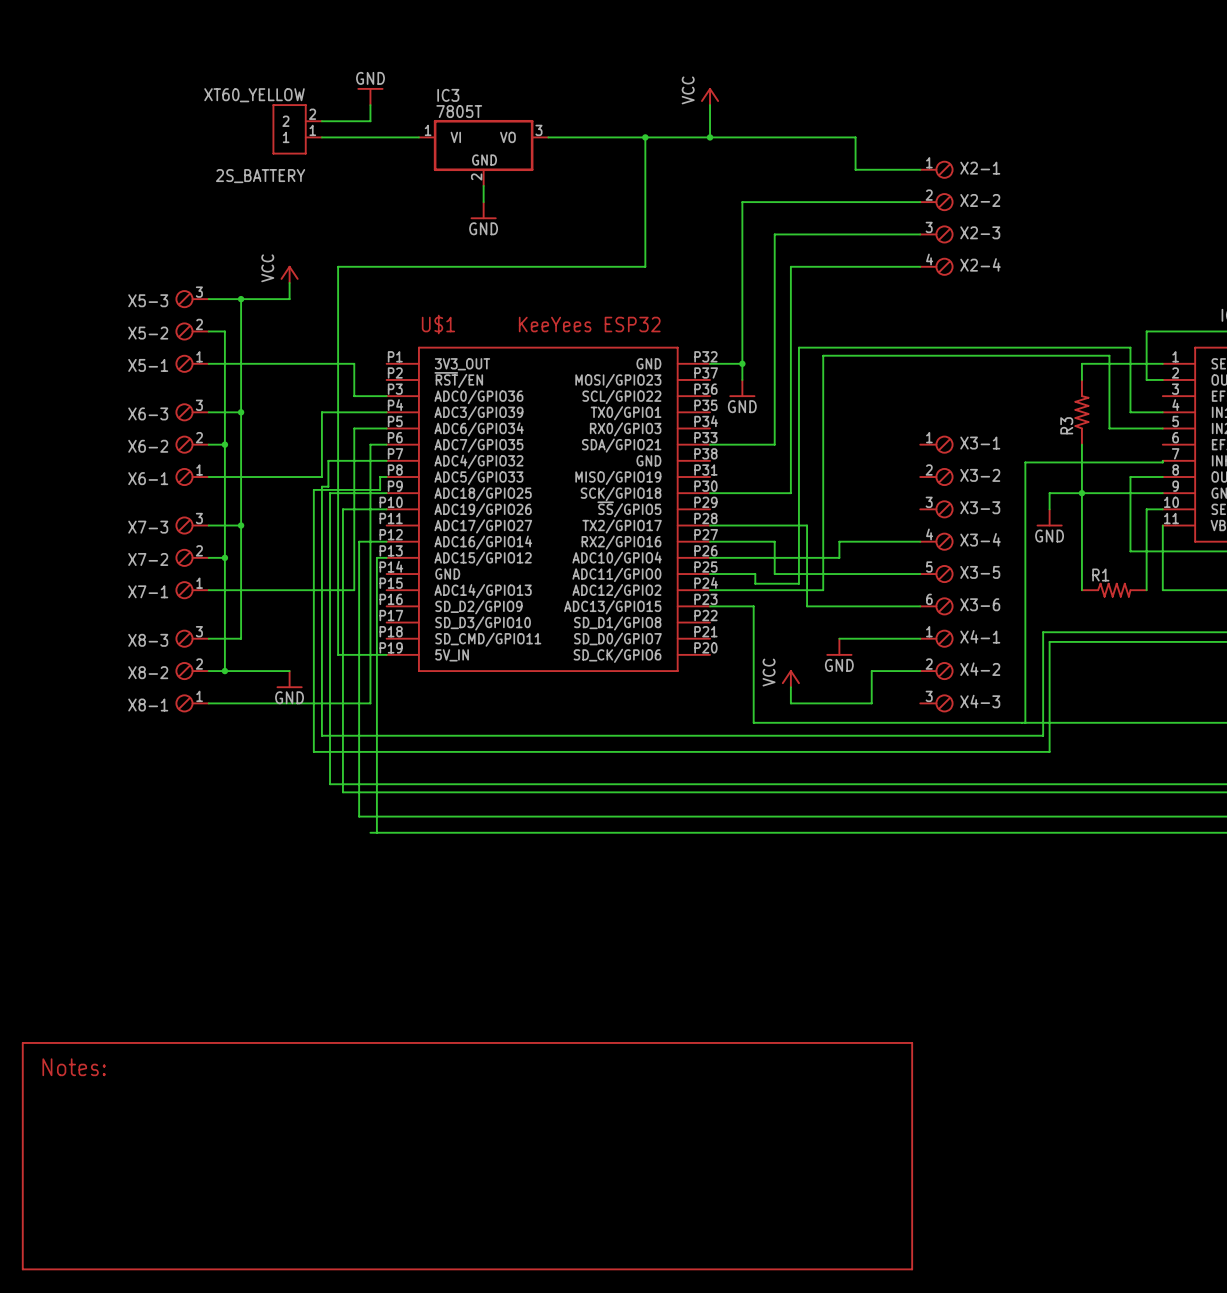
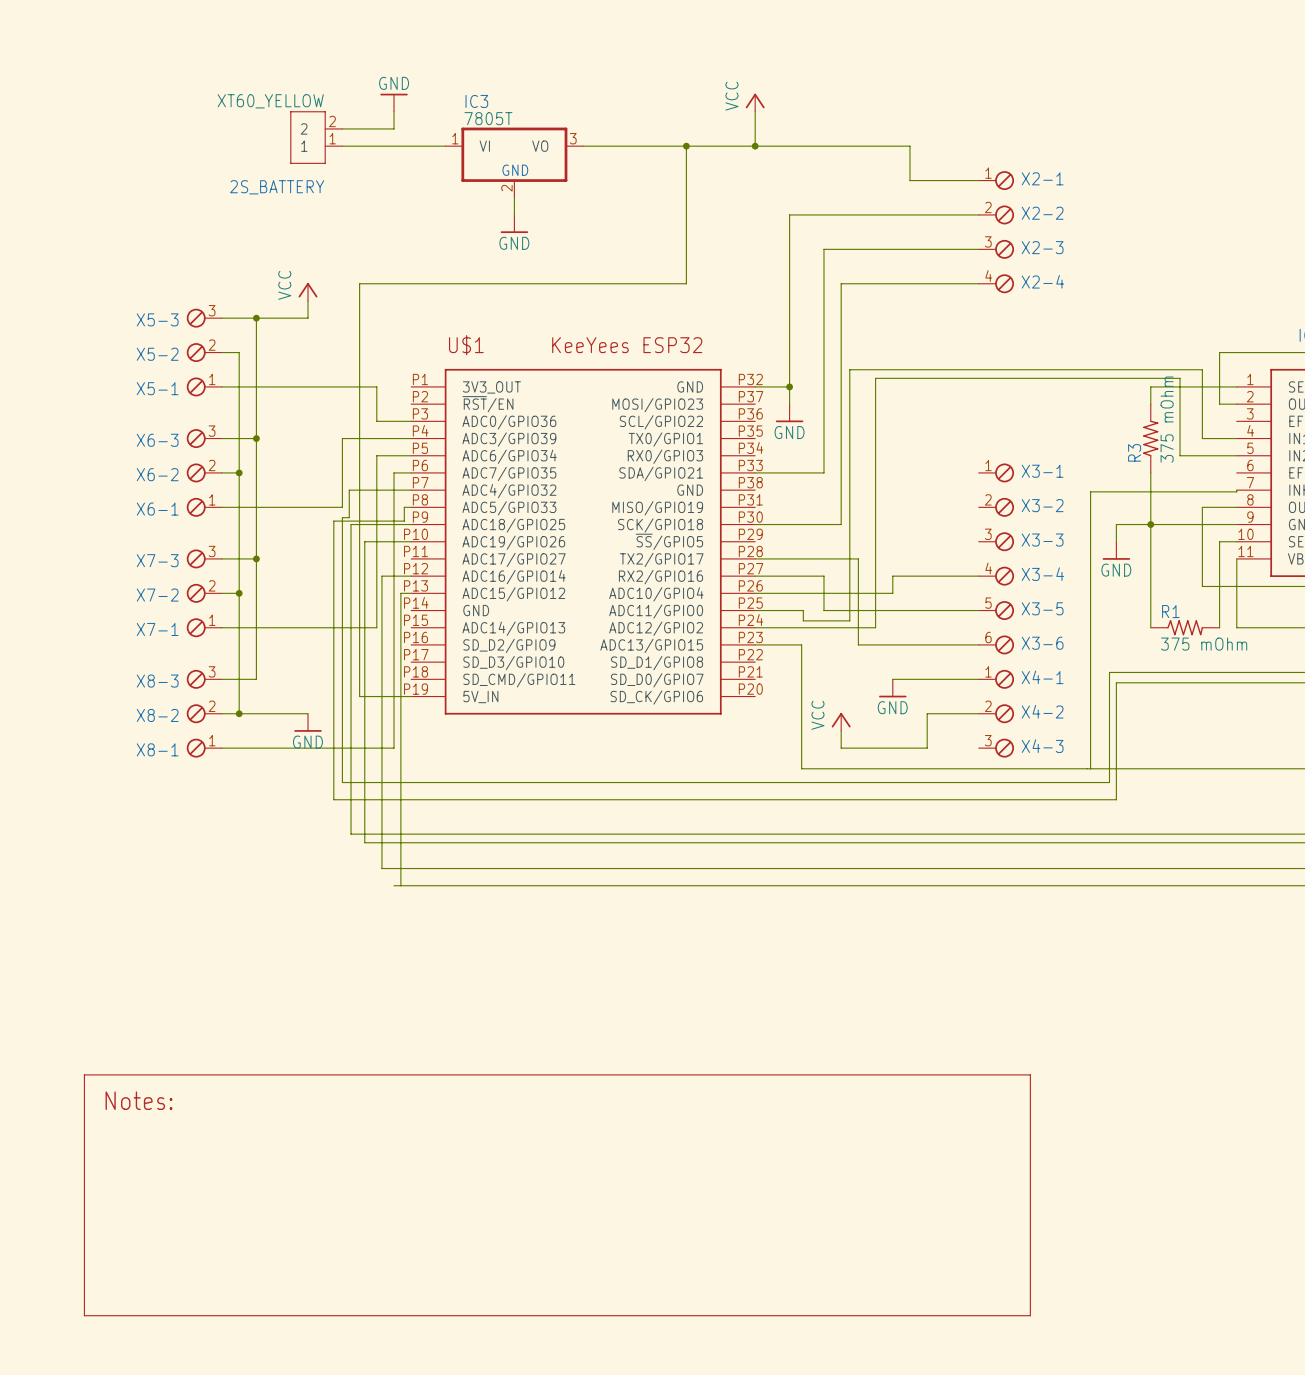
R3 value: none -> 375 mOhm (1167, 419)
R1 value: none -> 375 mOhm (1204, 644)
part position: (467, 1156) -> (557, 1195)

